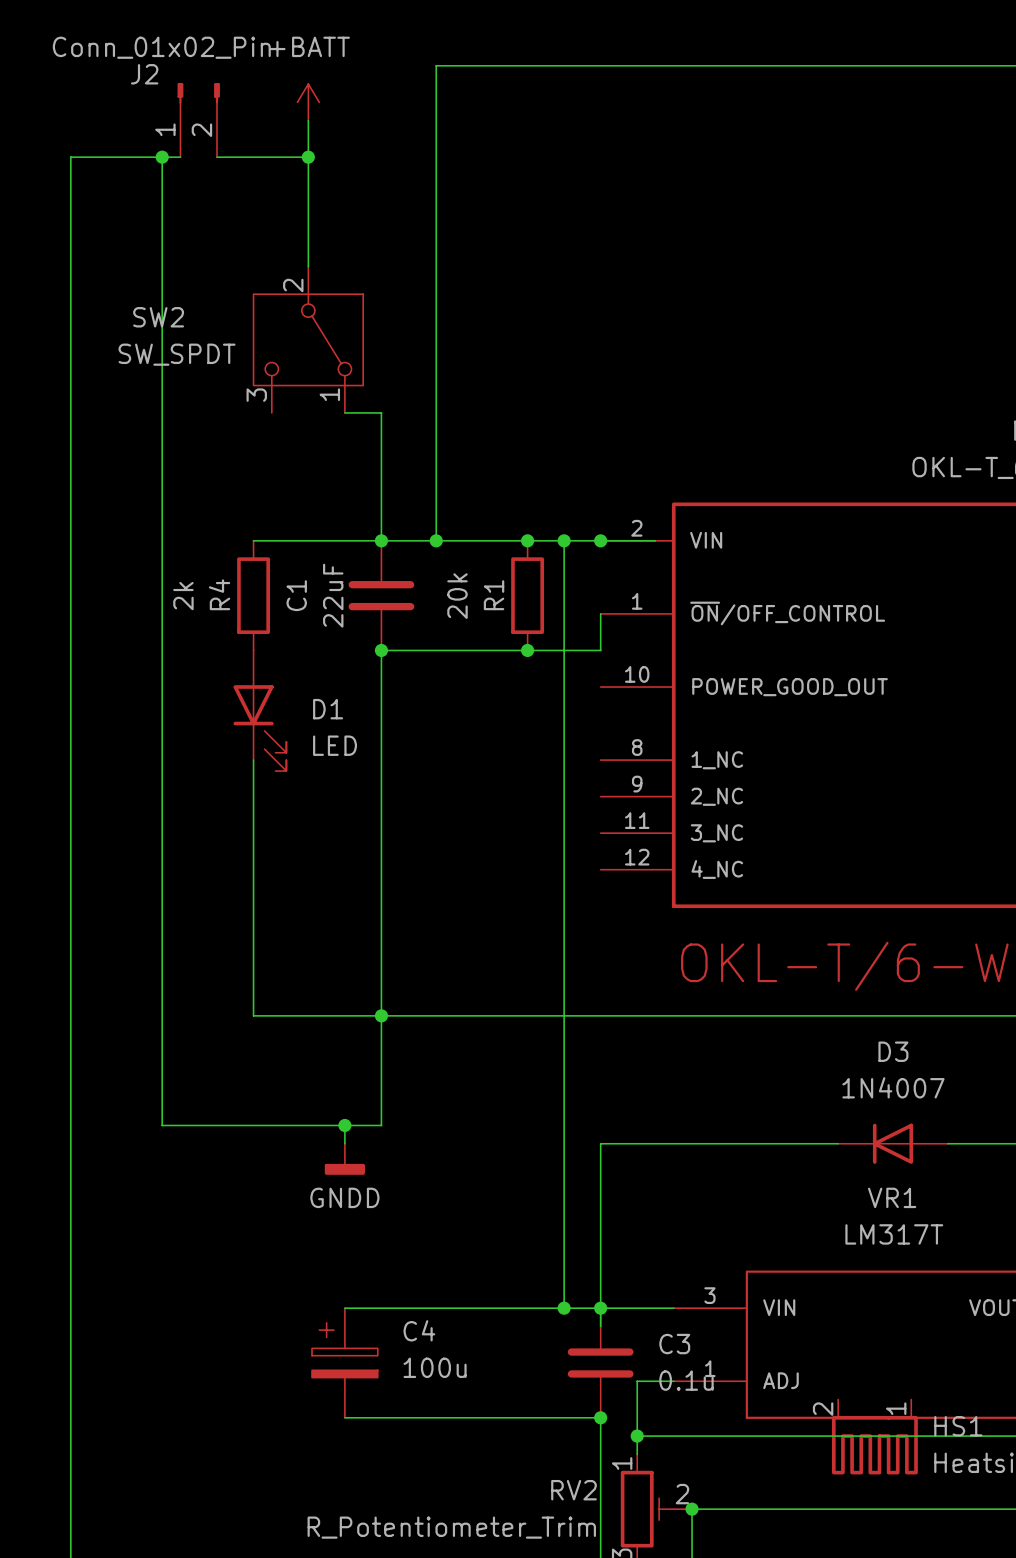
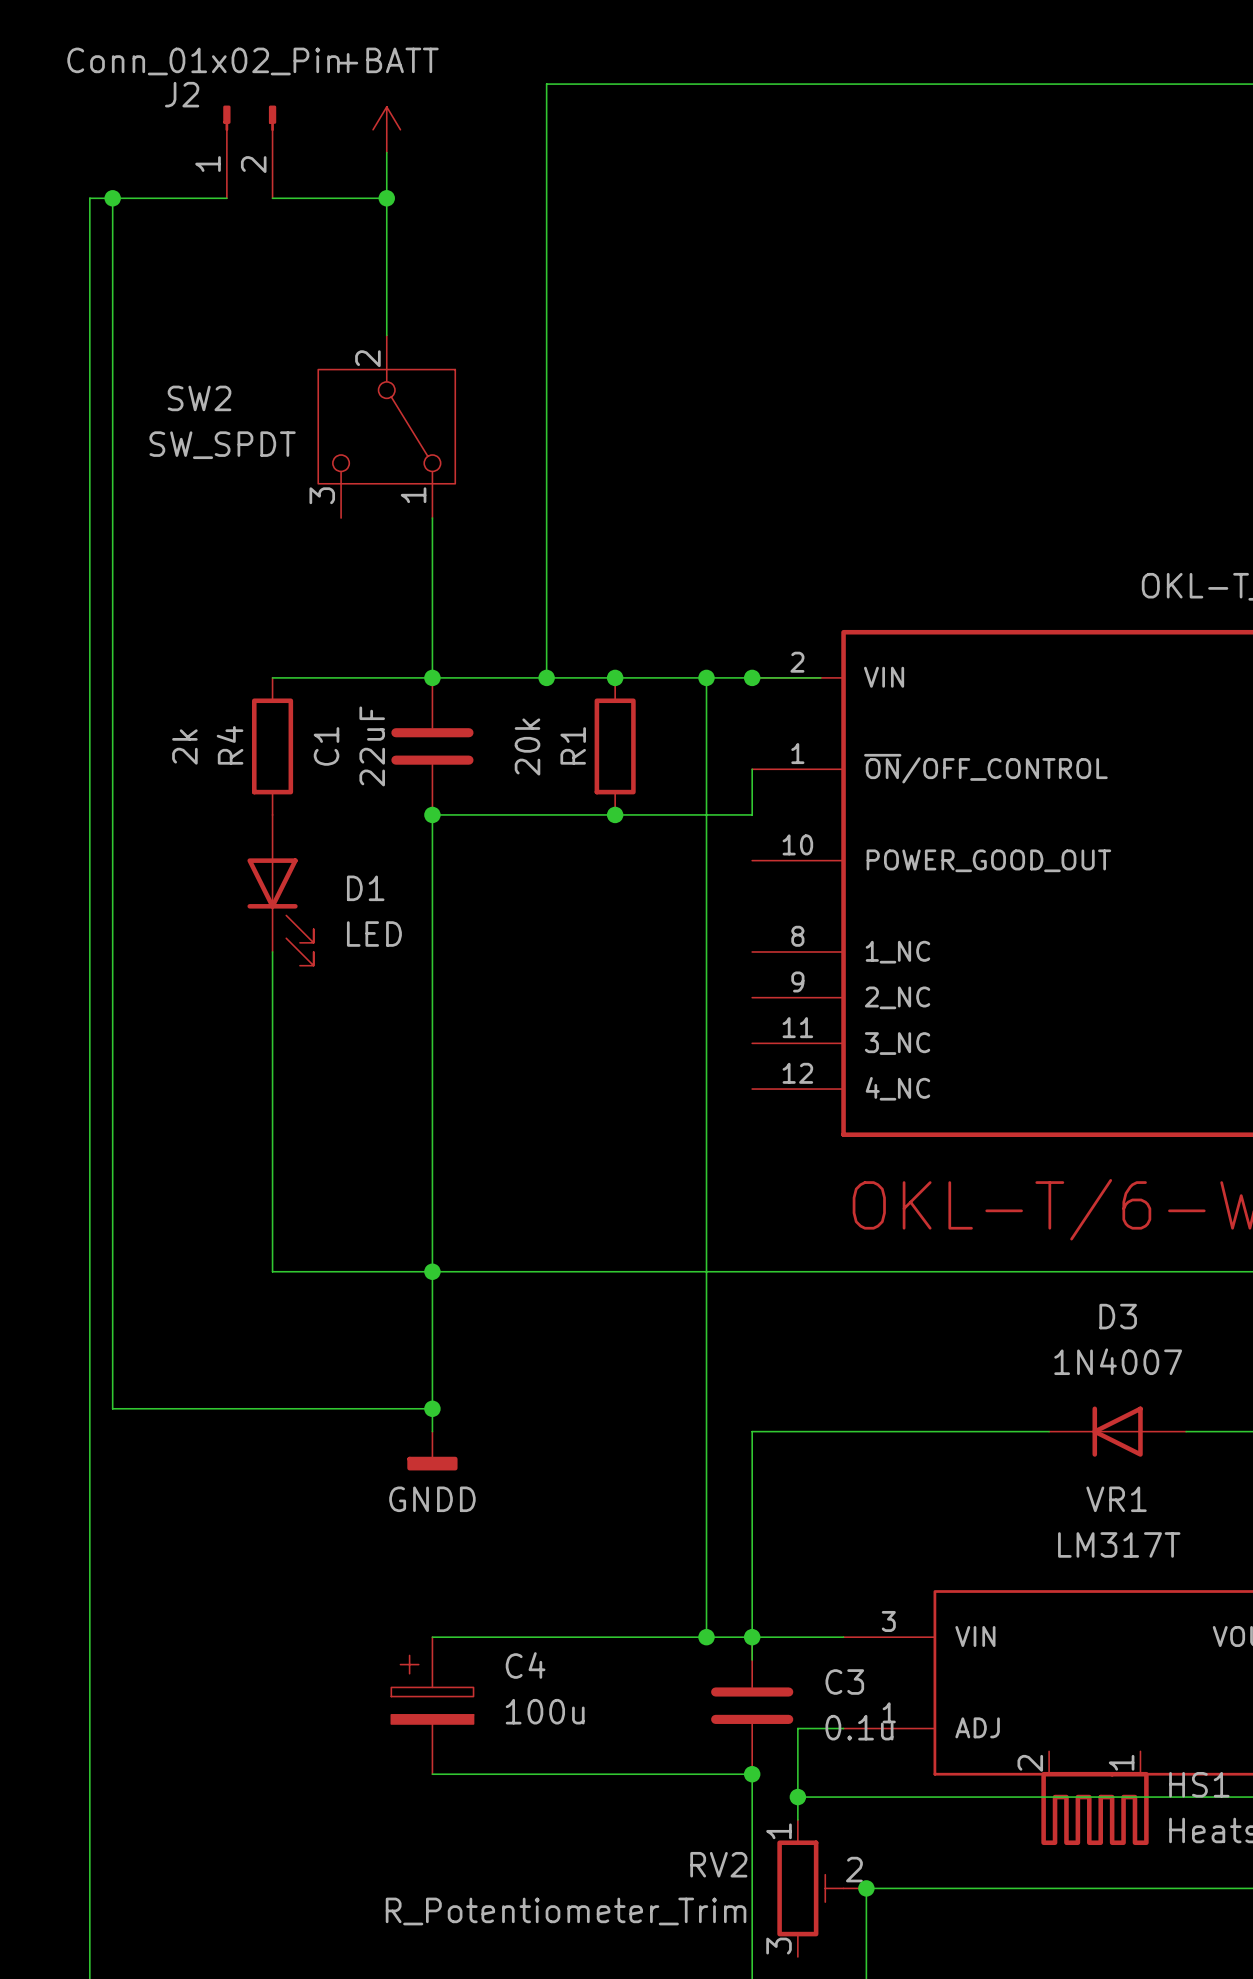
wire: (162, 157) (162, 1125) -> (112, 198) (112, 1408) (204, 1408)
junction position: (162, 157) -> (112, 198)
wire: (344, 412) (381, 412) (381, 540) -> (432, 518) (432, 677)
wire: none -> (272, 677) (318, 677)
junction position: (381, 540) -> (432, 677)
junction position: (527, 540) -> (615, 677)
R4 position: (253, 595) -> (272, 746)
C1 position: (381, 595) -> (432, 746)
R1 position: (527, 595) -> (615, 746)
wire: (381, 650) (381, 1125) (344, 1125) -> (478, 814) (432, 814) (432, 1408)
junction position: (381, 650) -> (432, 814)
junction position: (527, 650) -> (615, 814)
D1 position: (259, 710) -> (280, 890)
wire: (253, 760) (253, 1015) -> (272, 951) (272, 1271) (318, 1271)
junction position: (381, 1015) -> (432, 1271)

